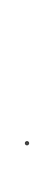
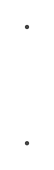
drawing: none -> [24, 24, 30, 30]

